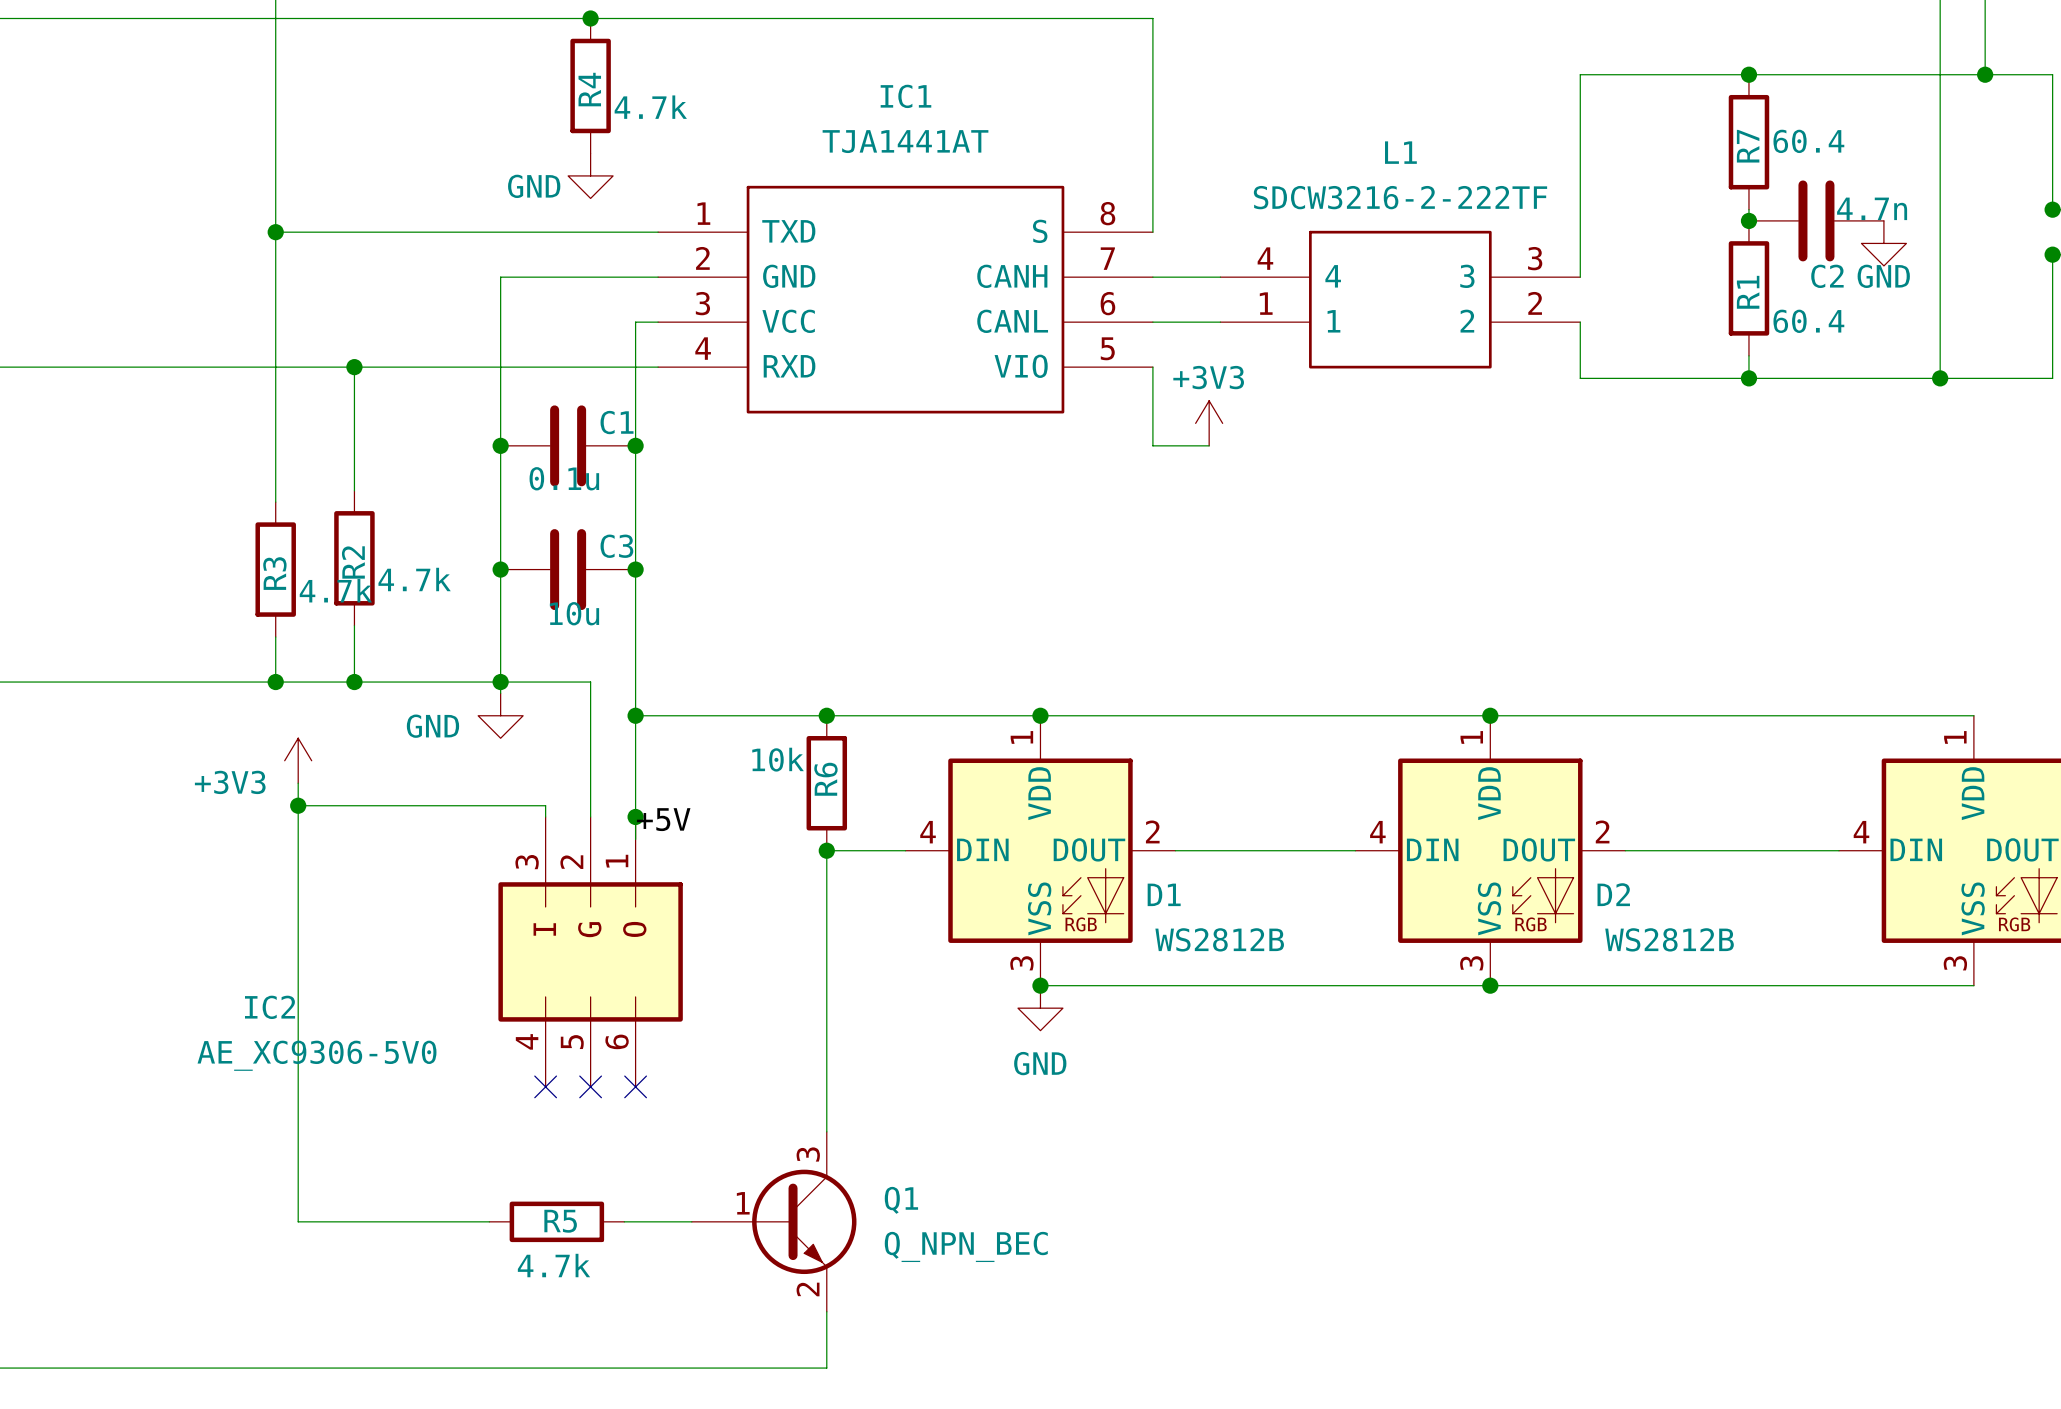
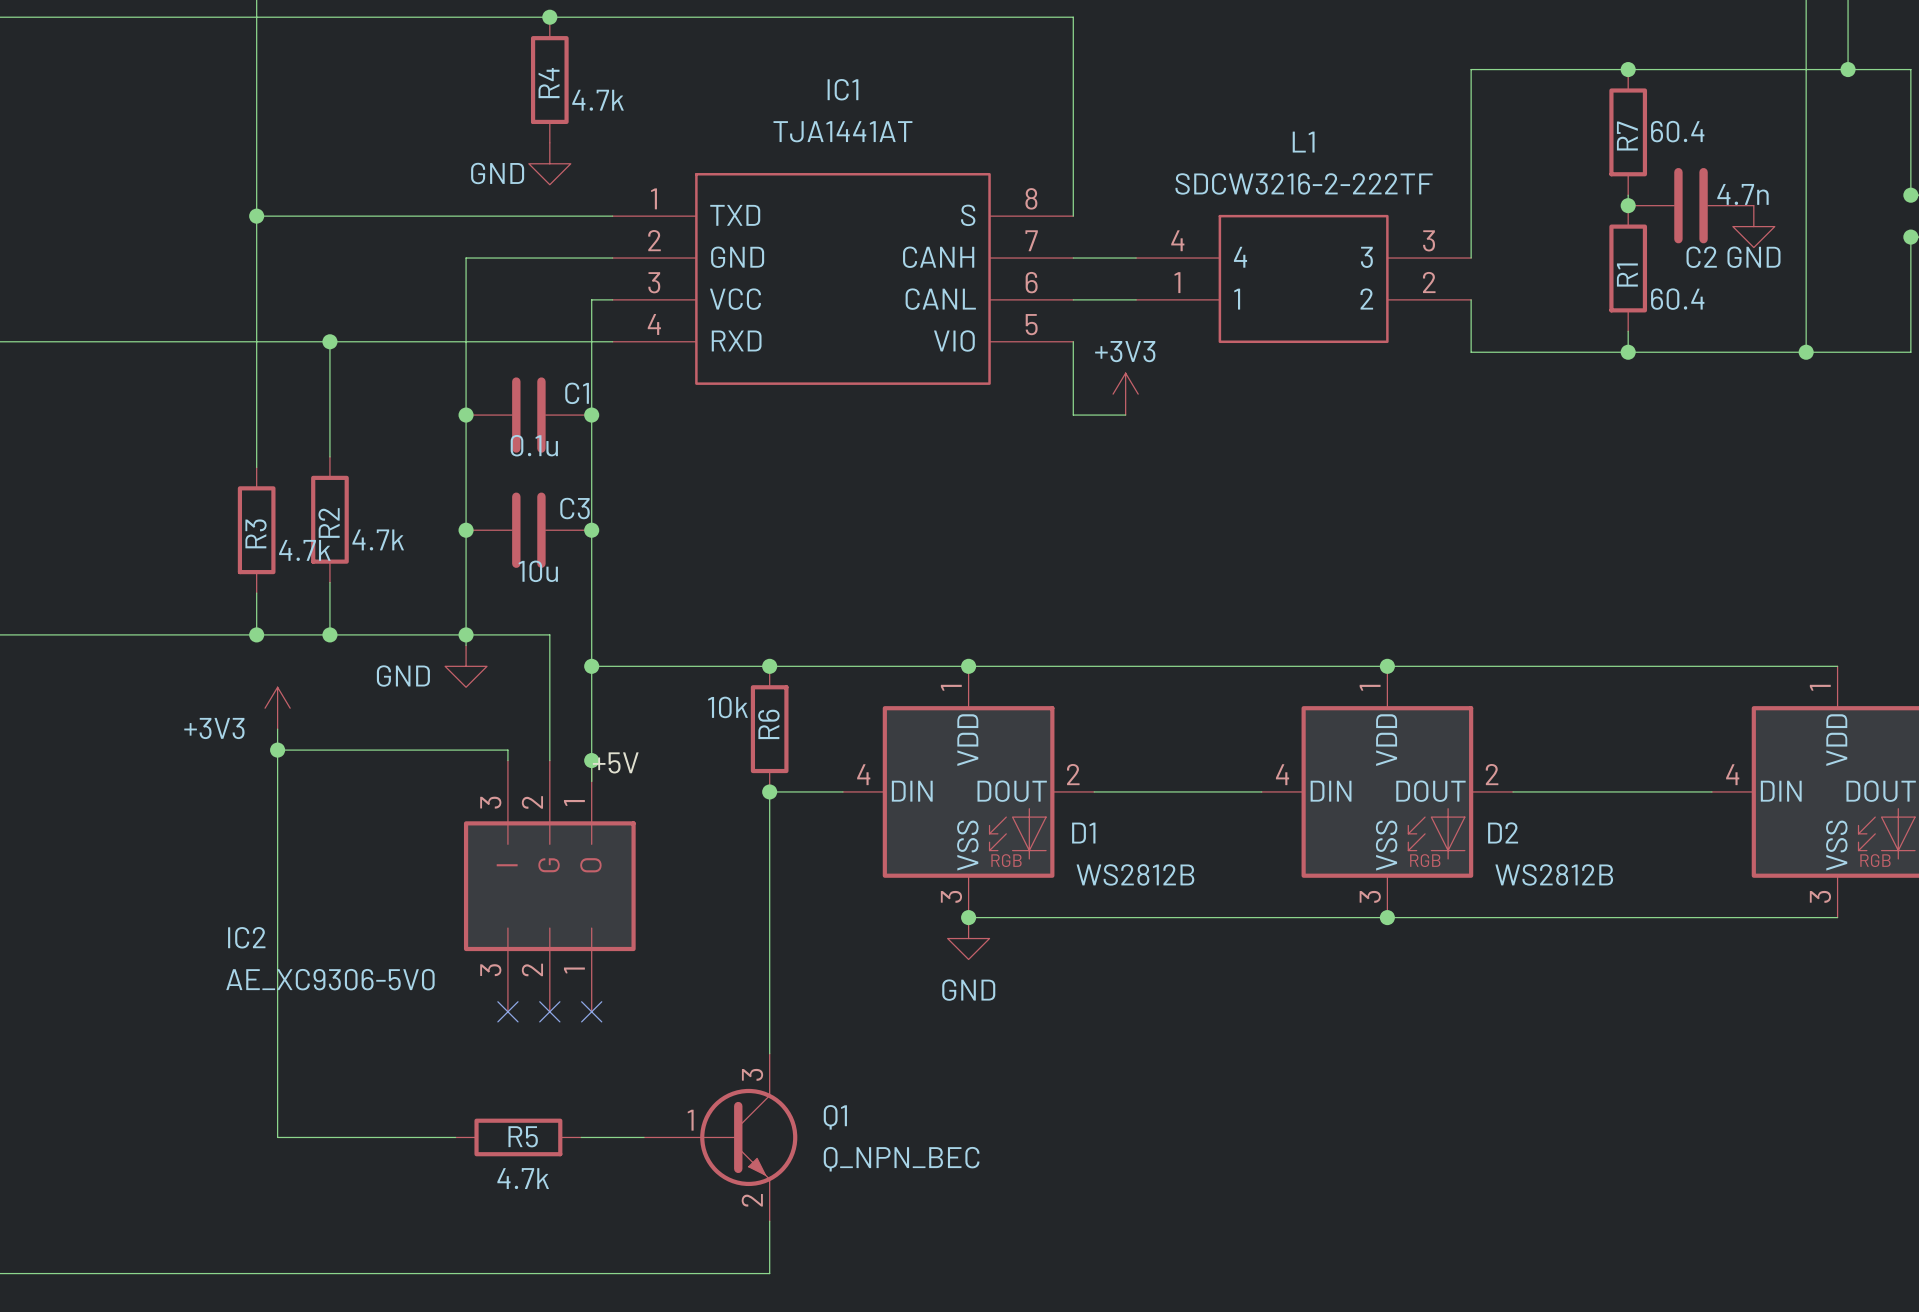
IC2 pin number: 4 (527, 1041) -> 3 (490, 970)
IC2 pin number: 6 (617, 1041) -> 1 (574, 970)
IC2 pin number: 5 (572, 1042) -> 2 (532, 969)
IC2 value position: AE_XC9306-5V0 (317, 1055) -> AE_XC9306-5V0 (330, 979)

